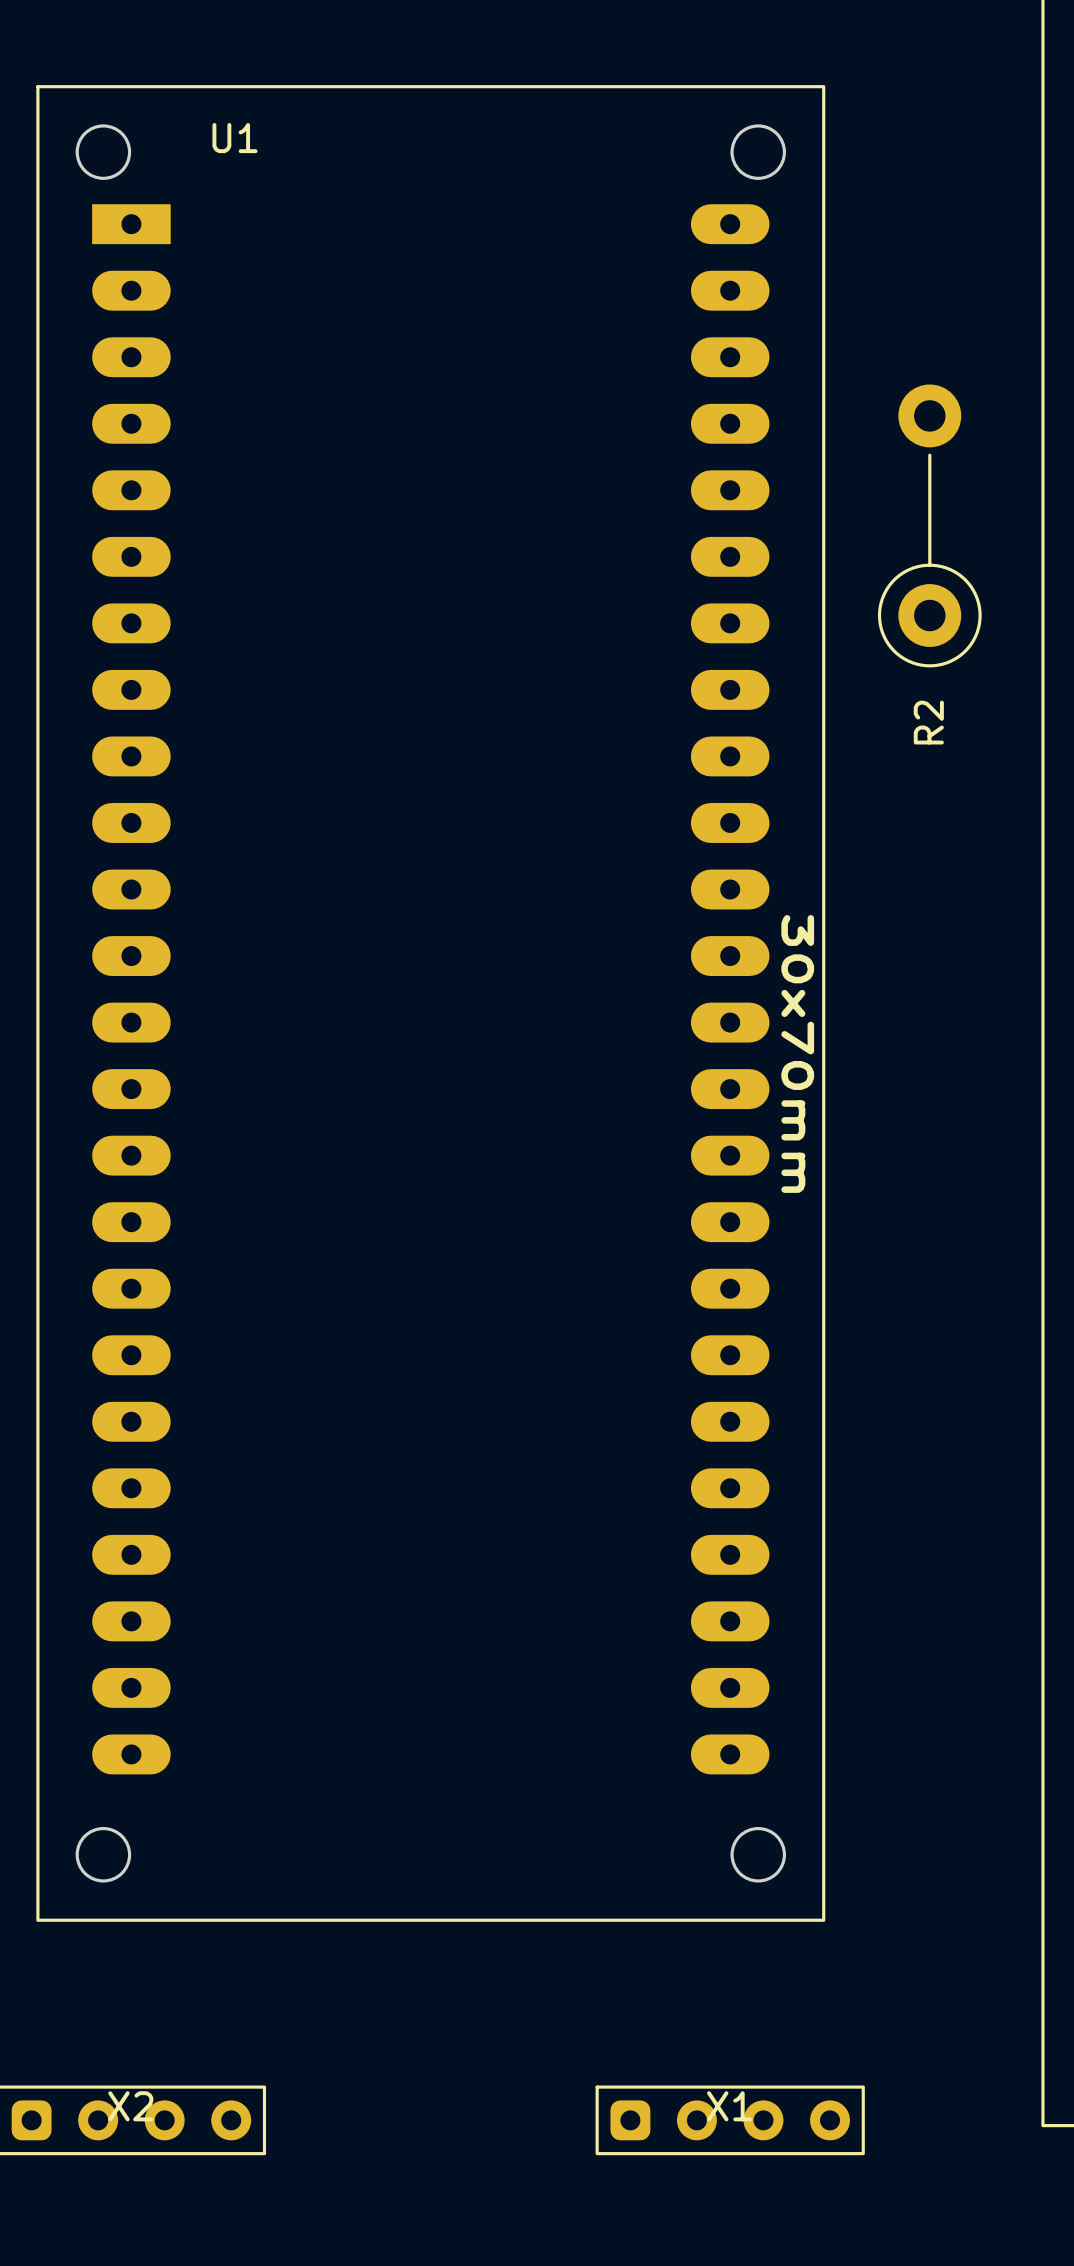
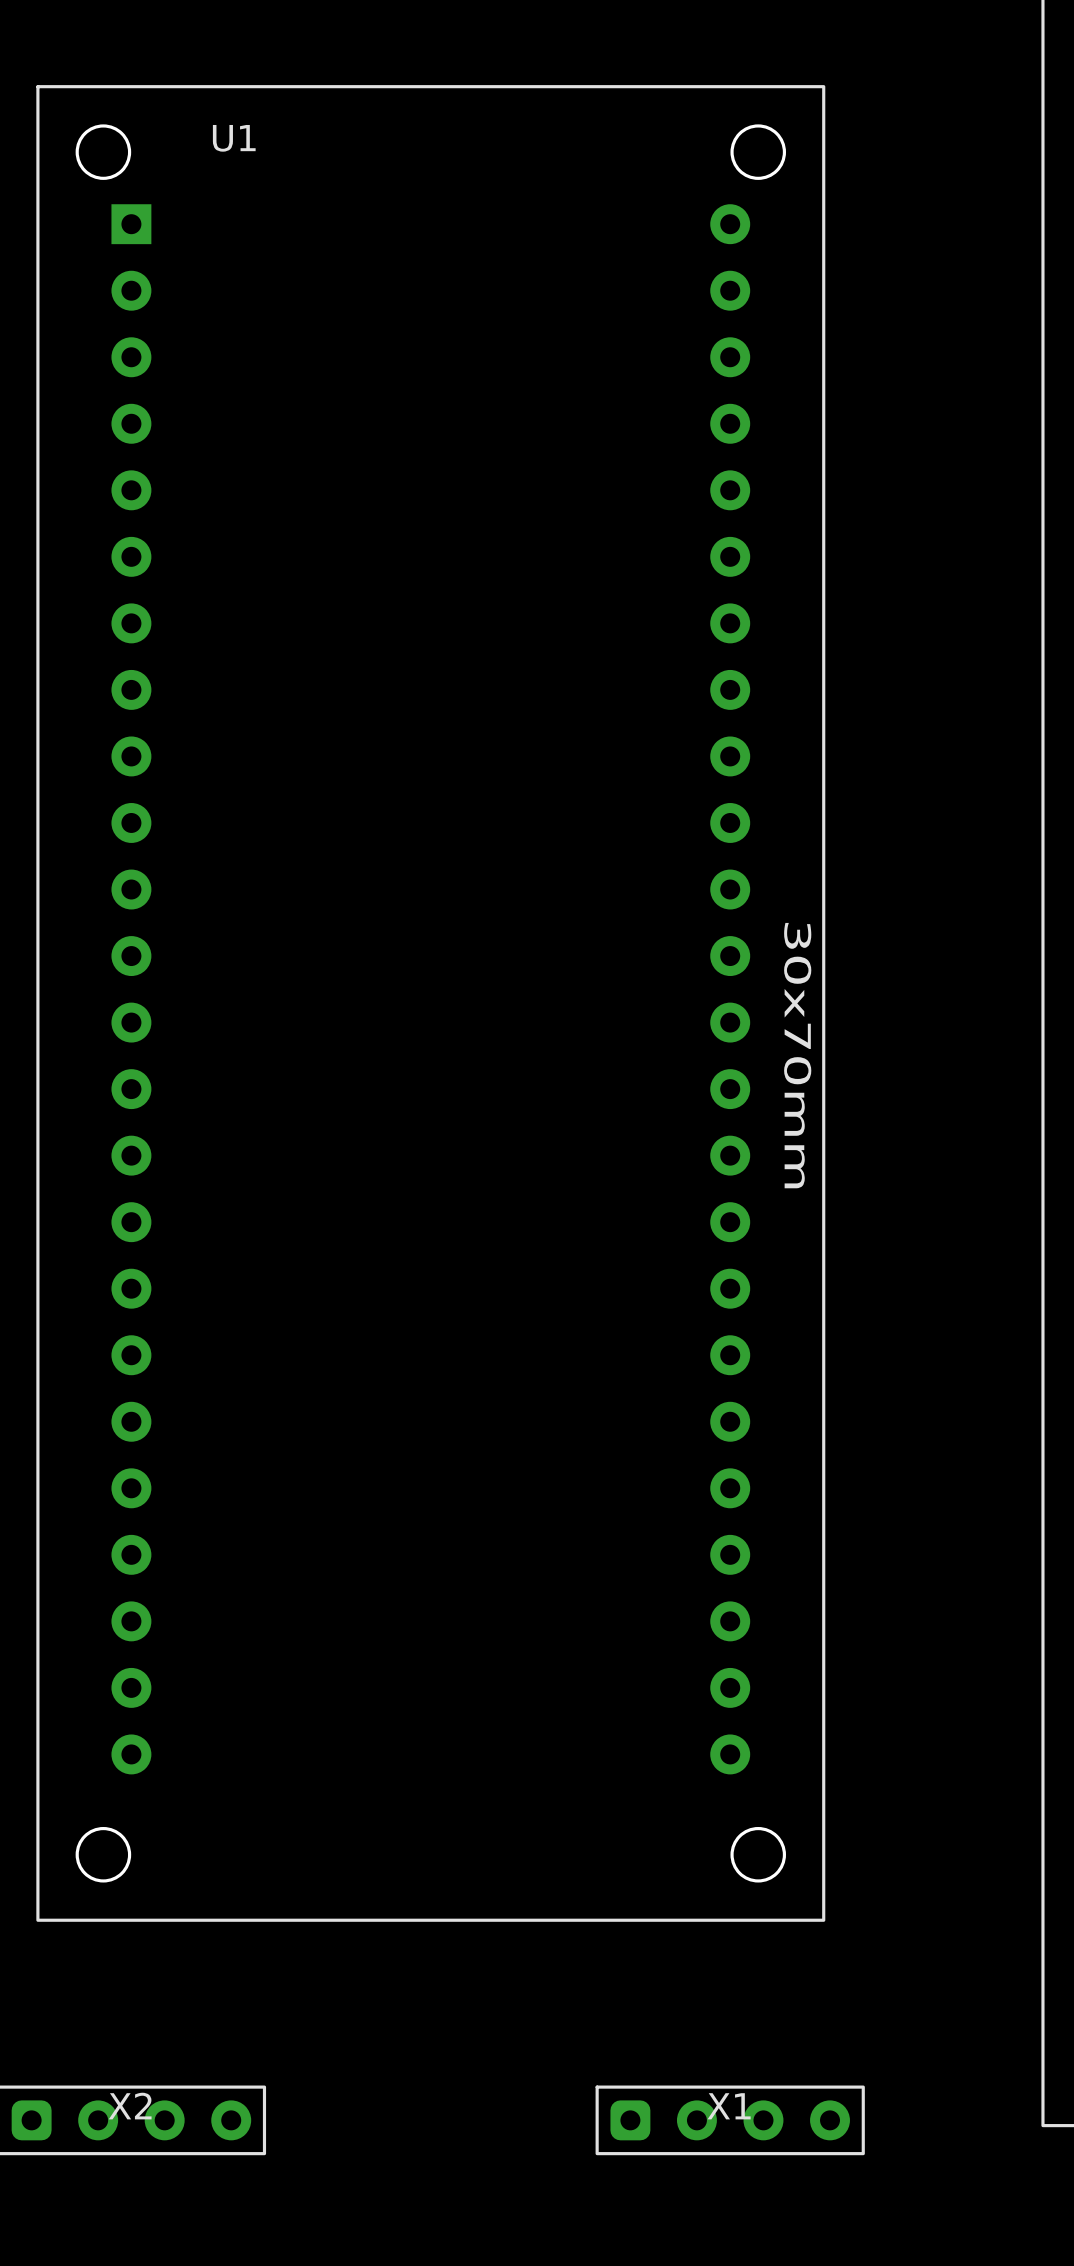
U1 footprint: [36, 85, 826, 1922] -> [36, 85, 826, 1922]
R2: (929, 525) -> none

